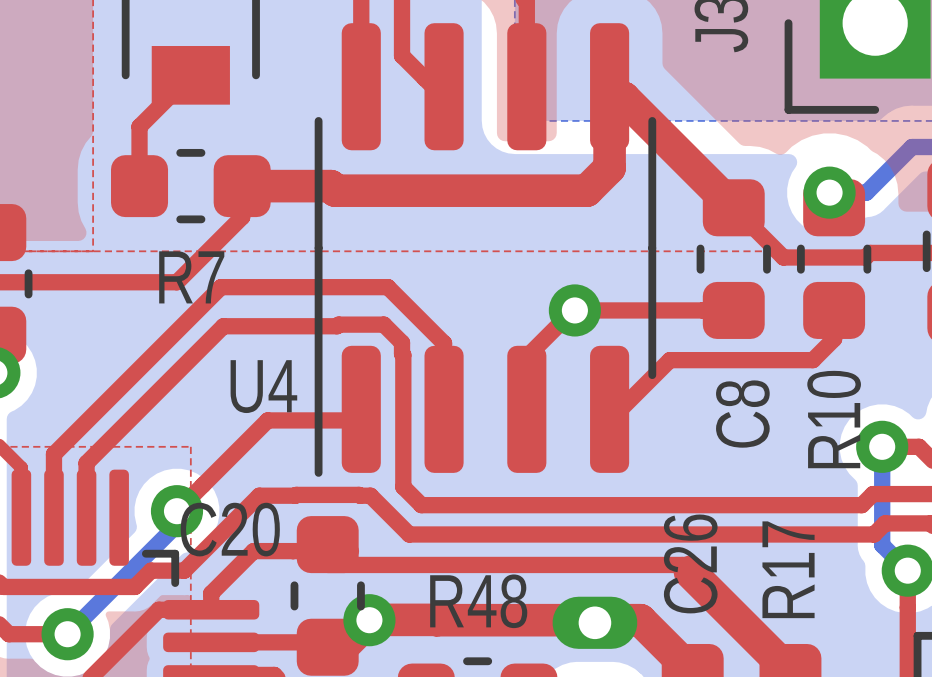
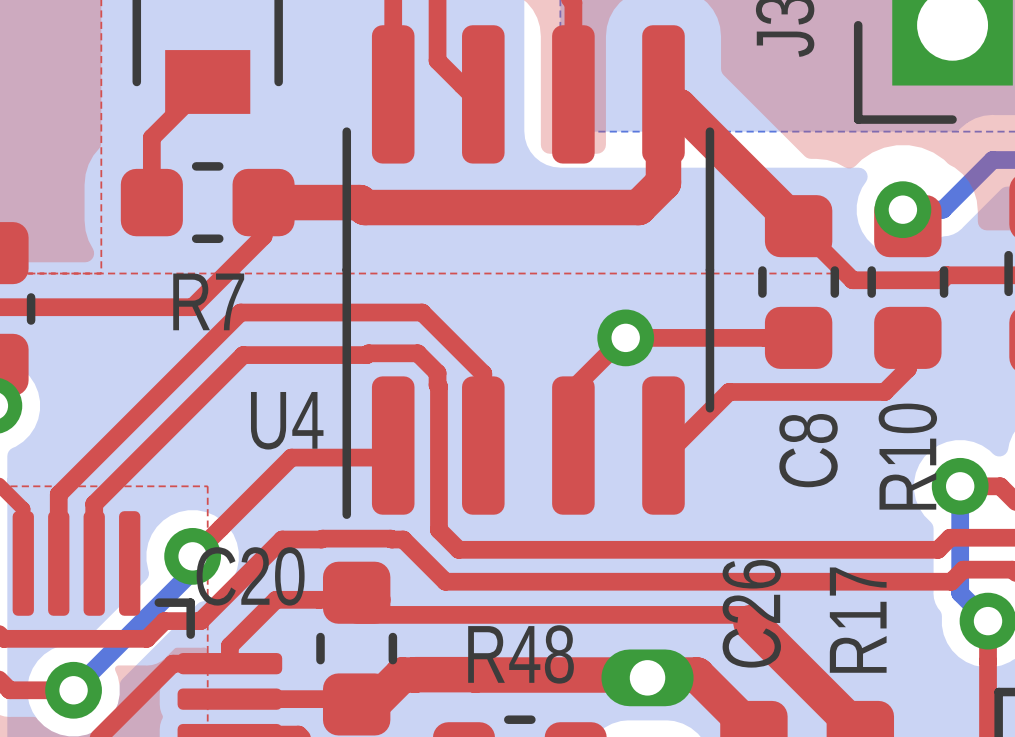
via: (369, 620) -> none

